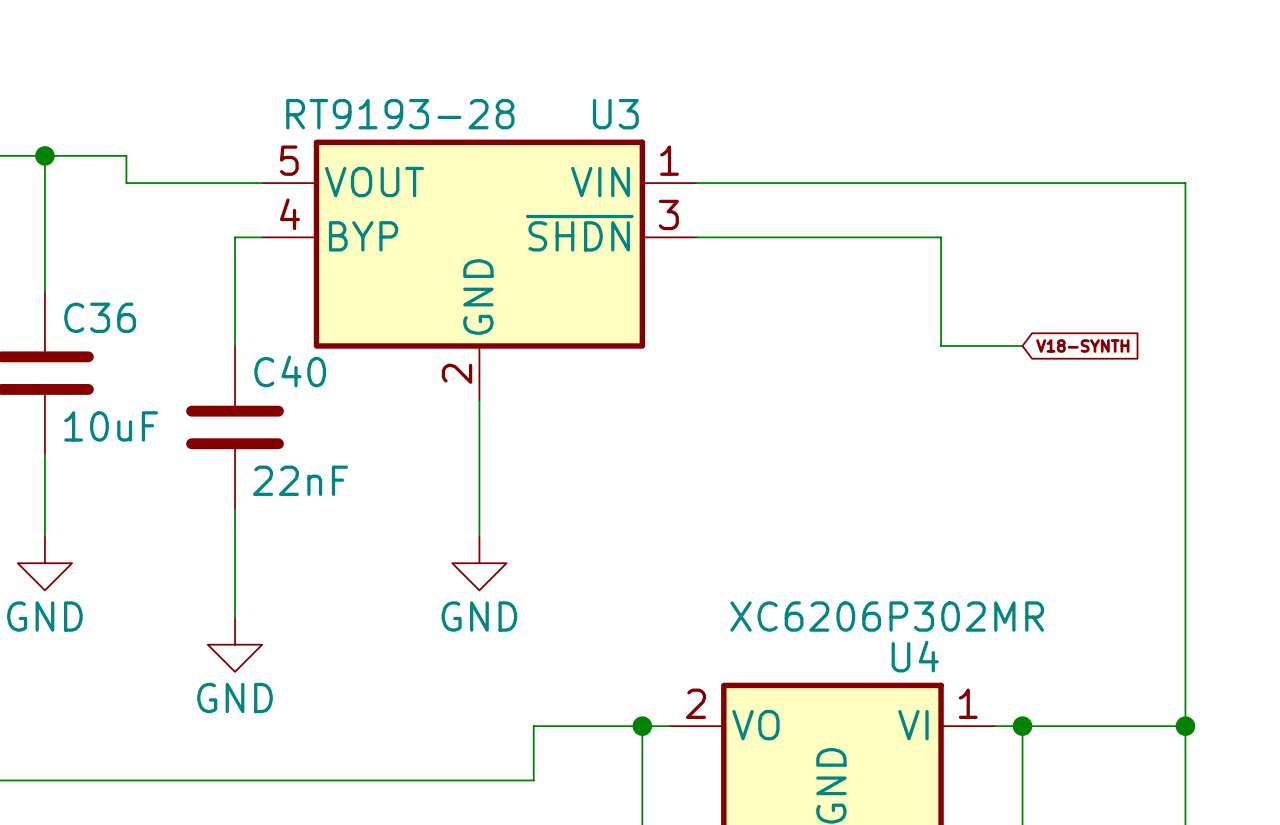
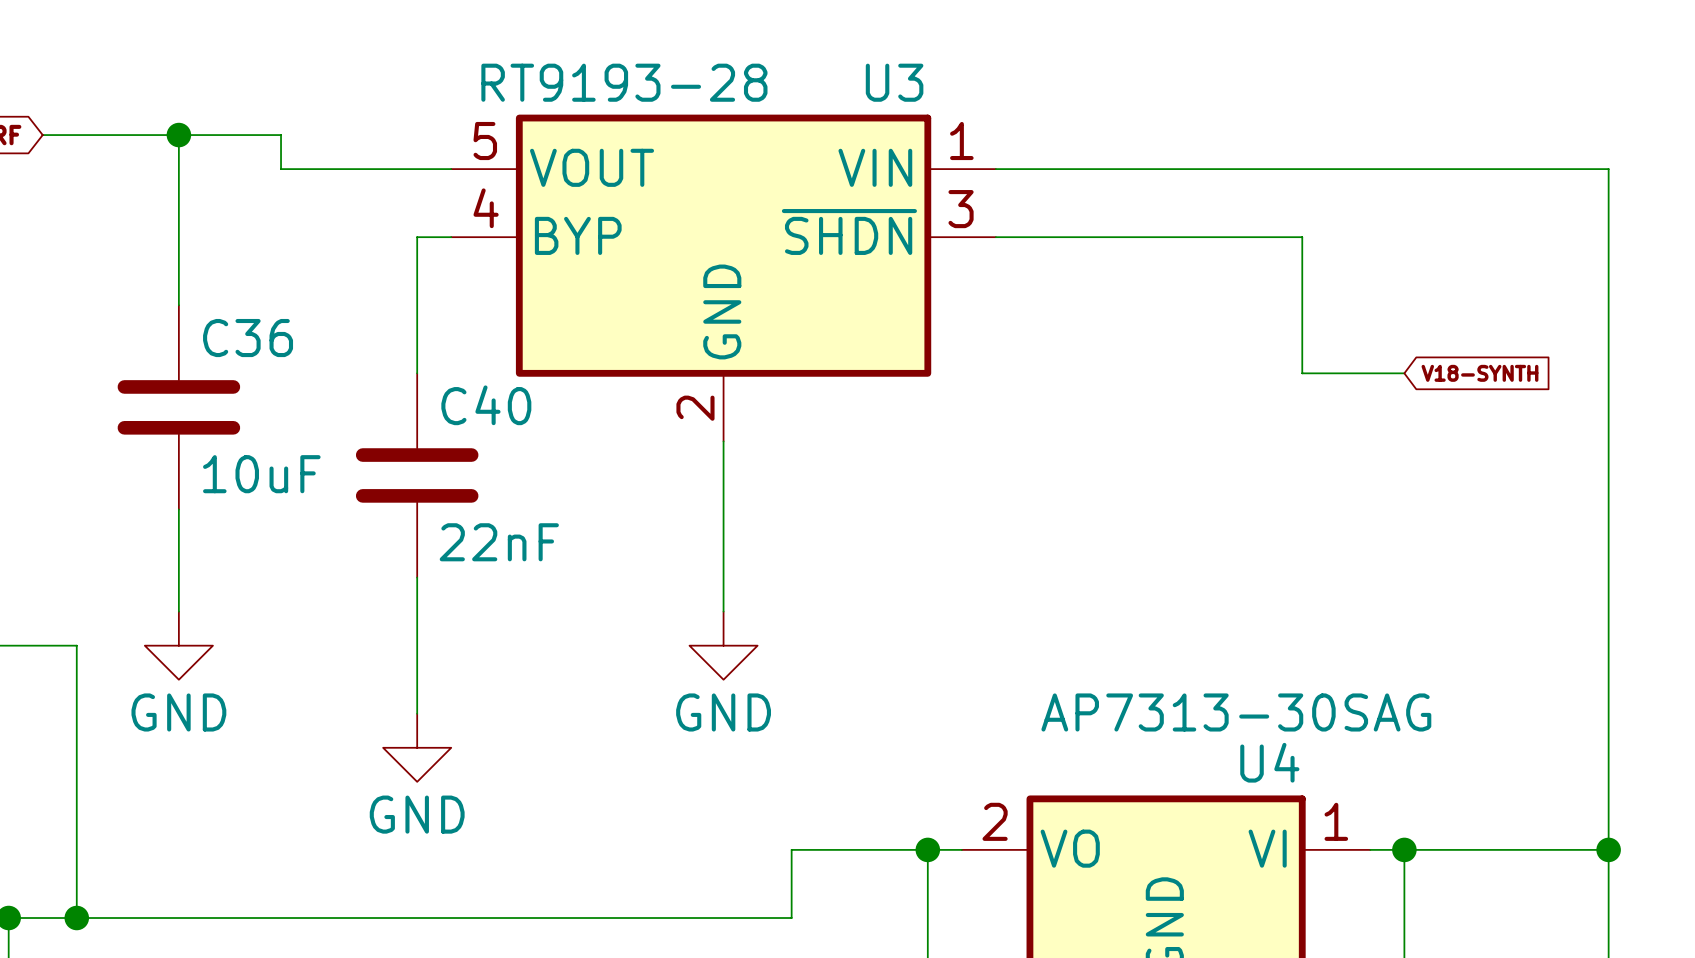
U4 value: XC6206P302MR (887, 616) -> AP7313-30SAG (1236, 712)

